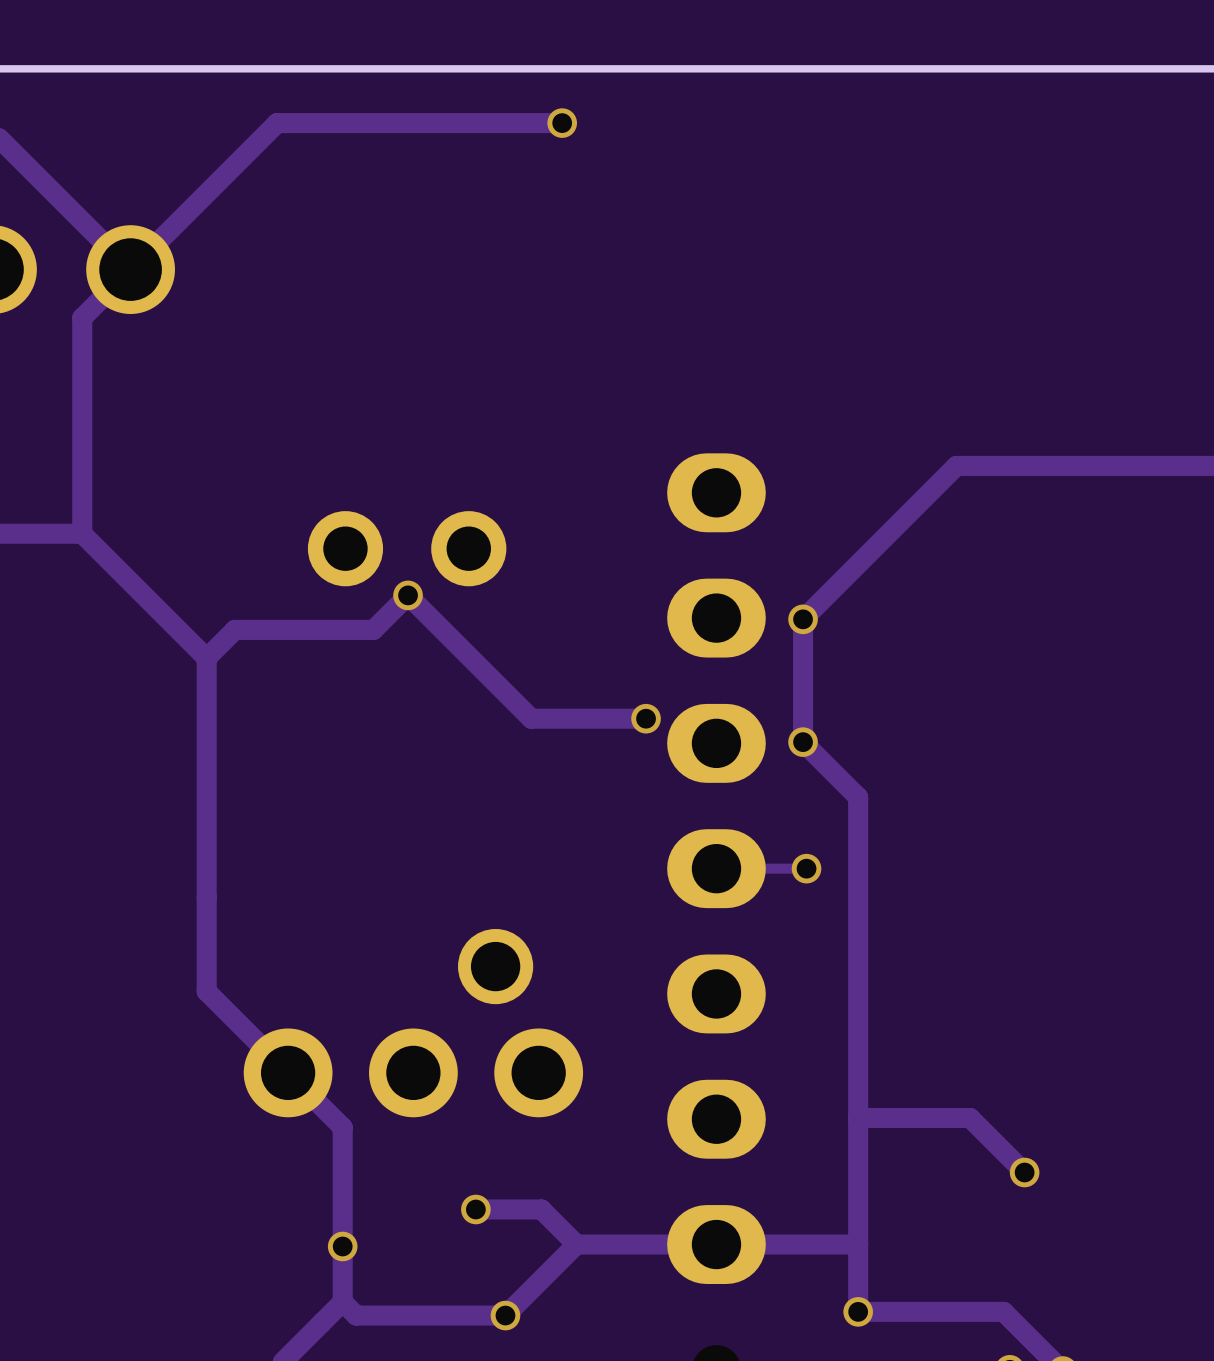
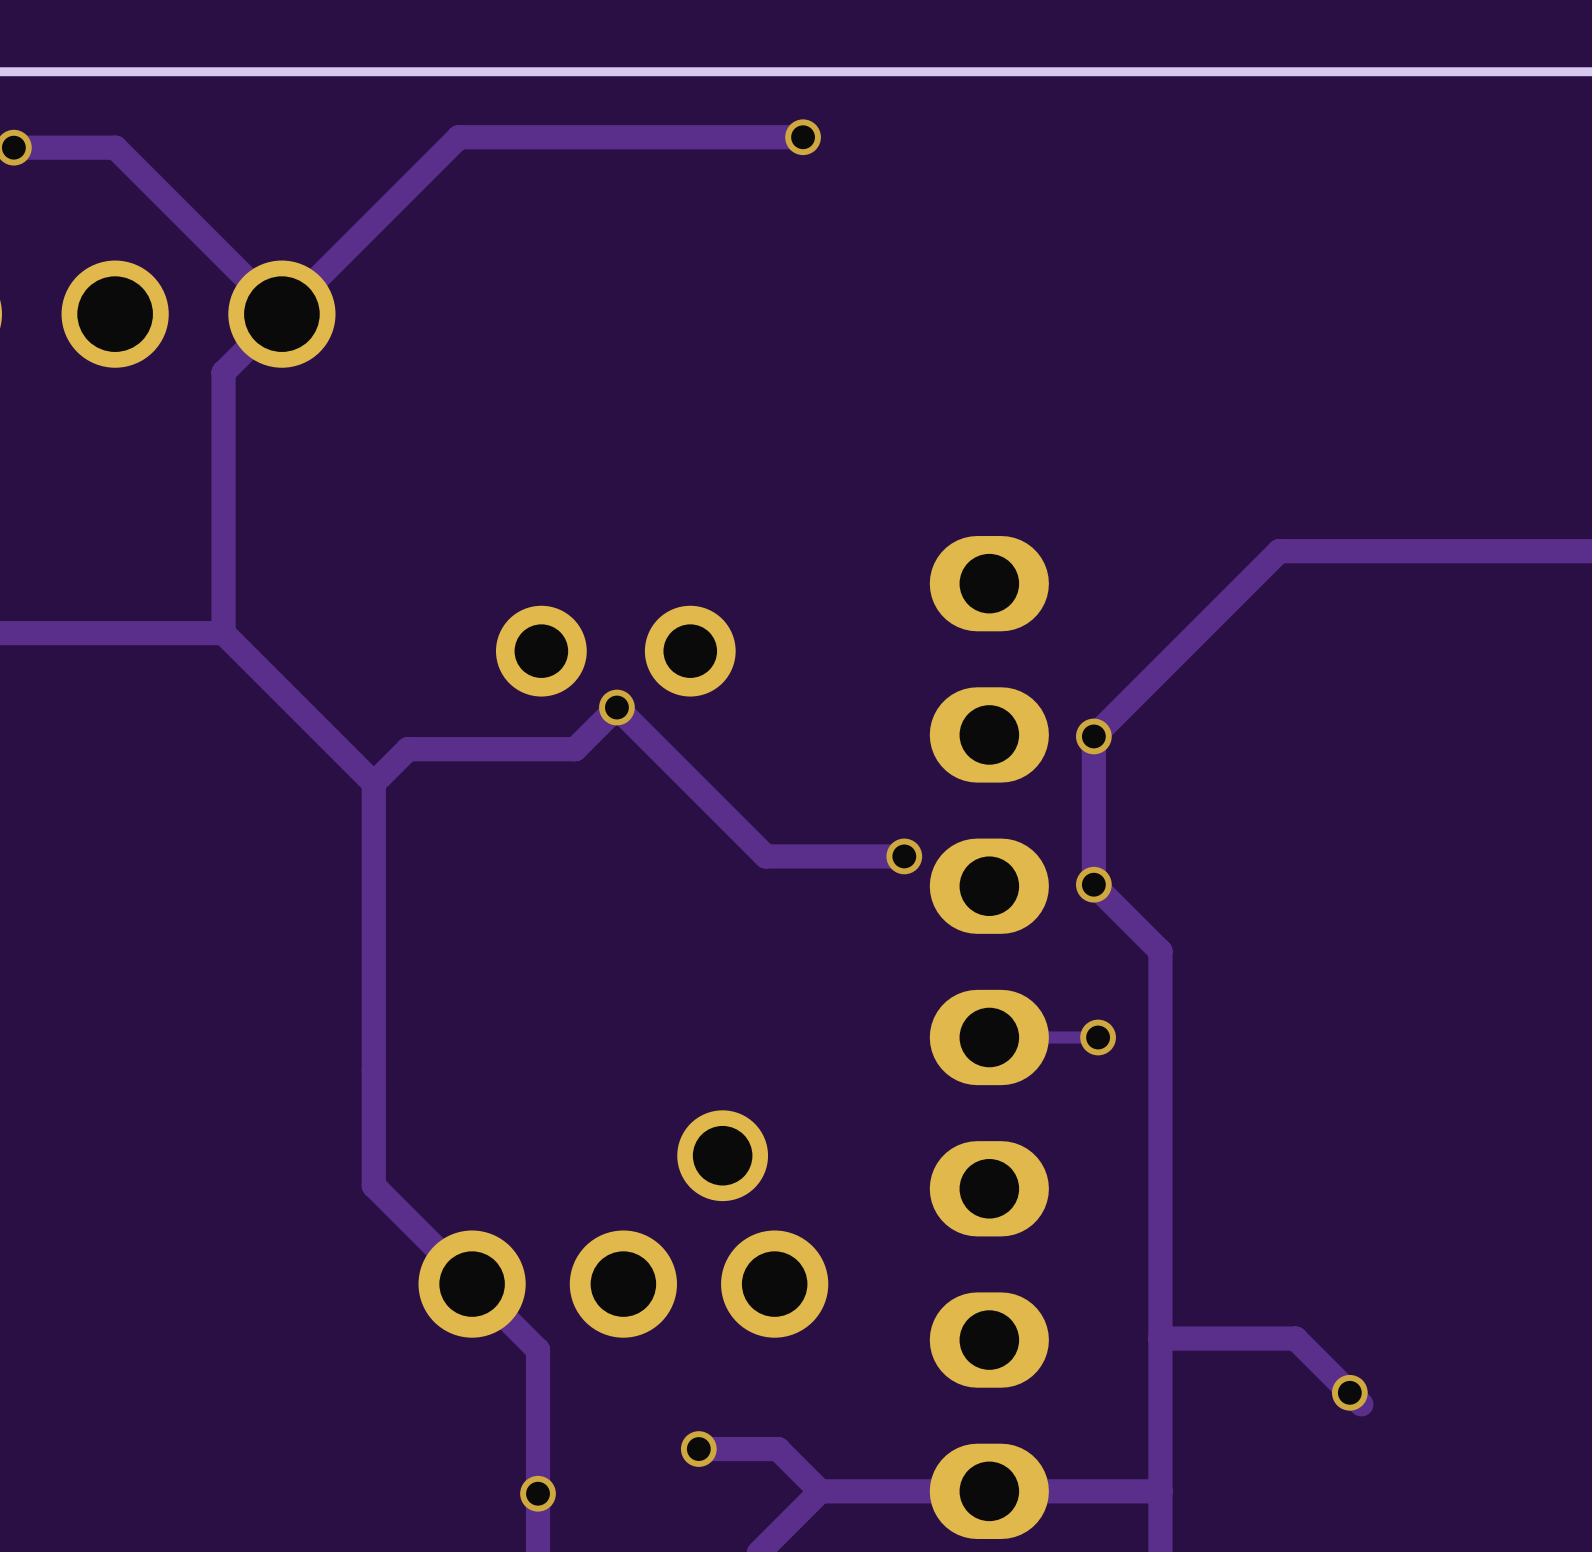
via position: (1024, 1172) -> (1349, 1392)

